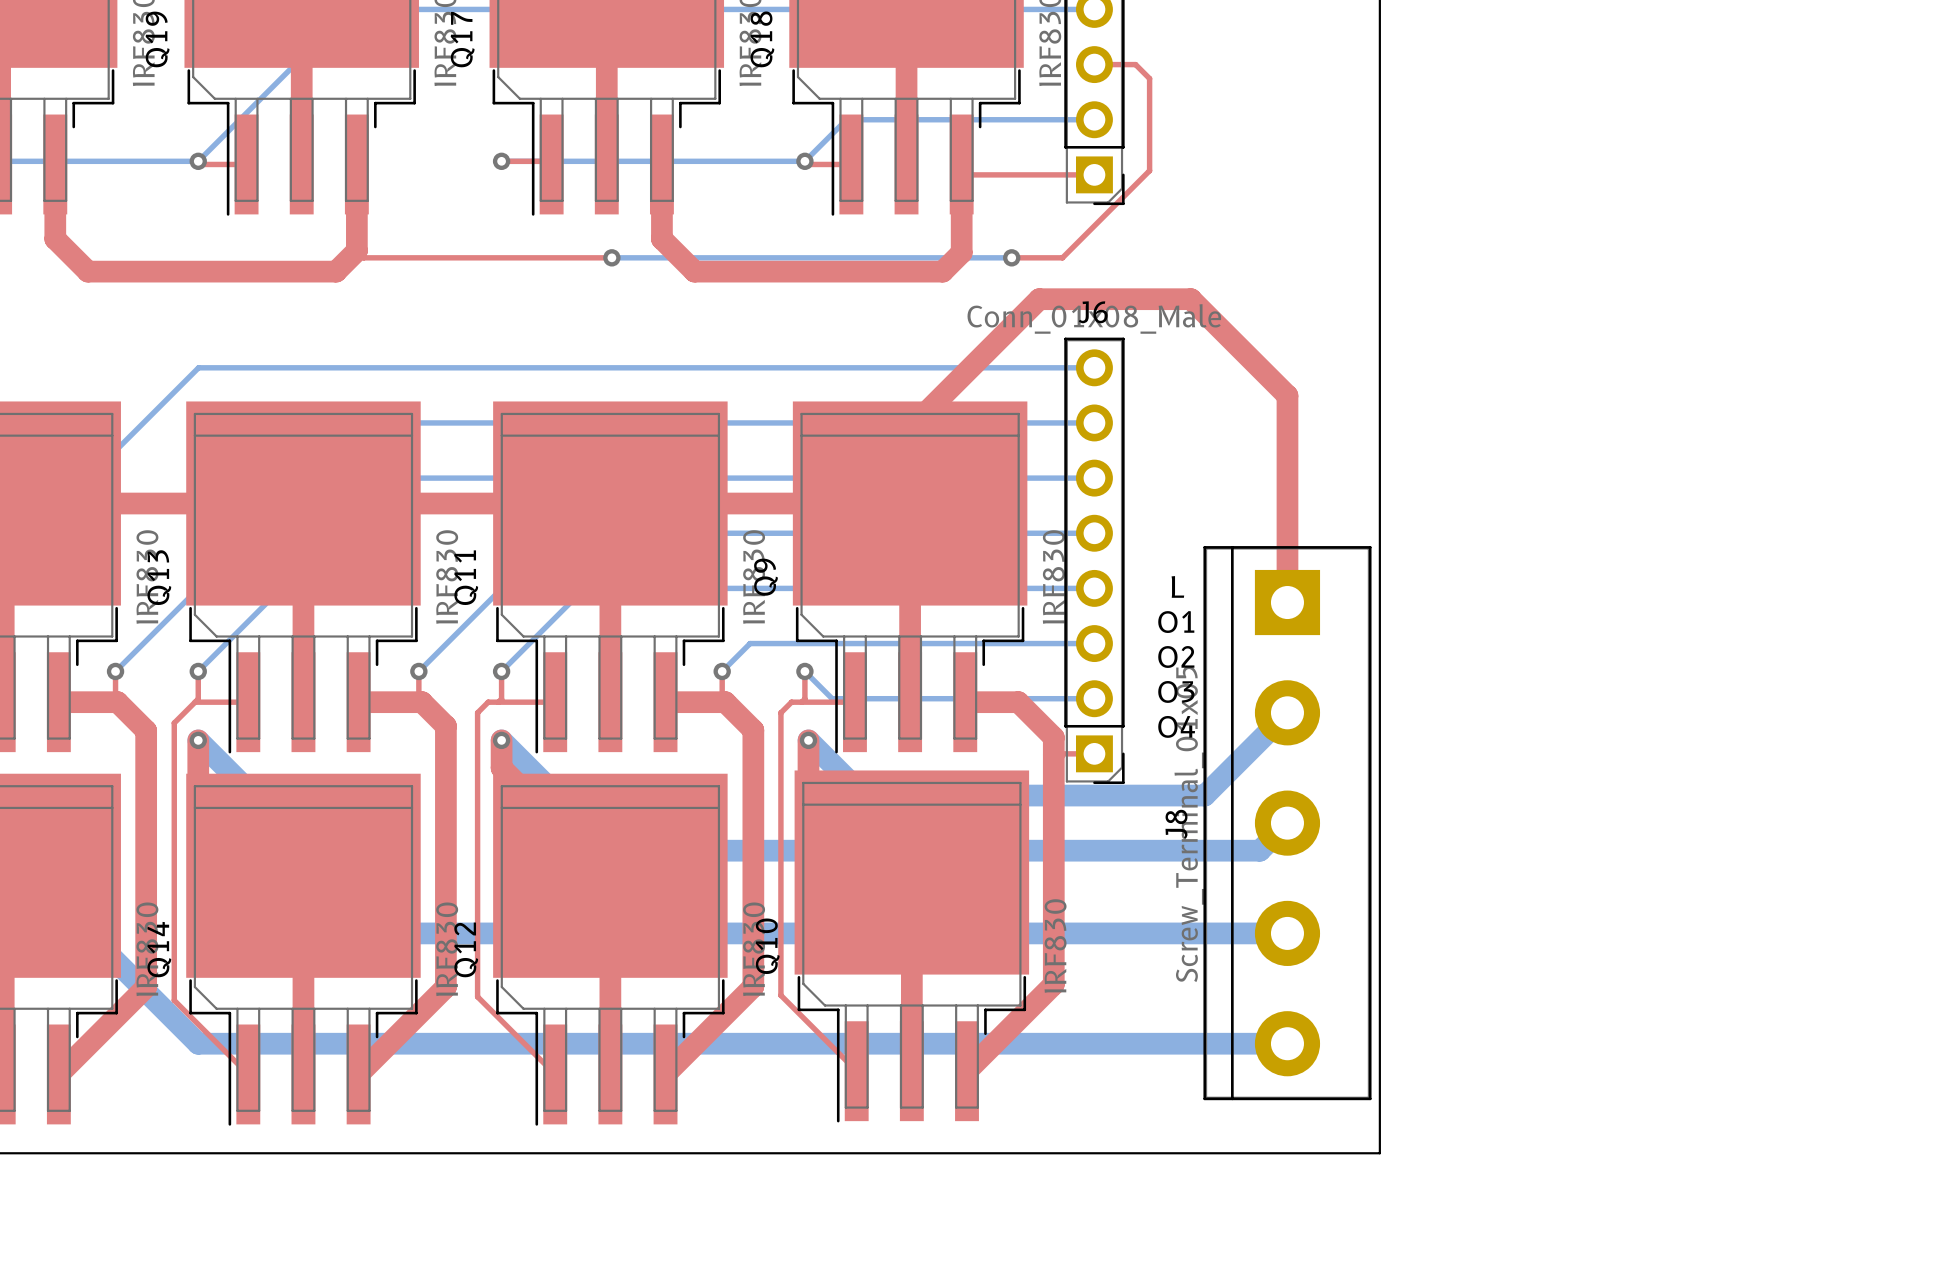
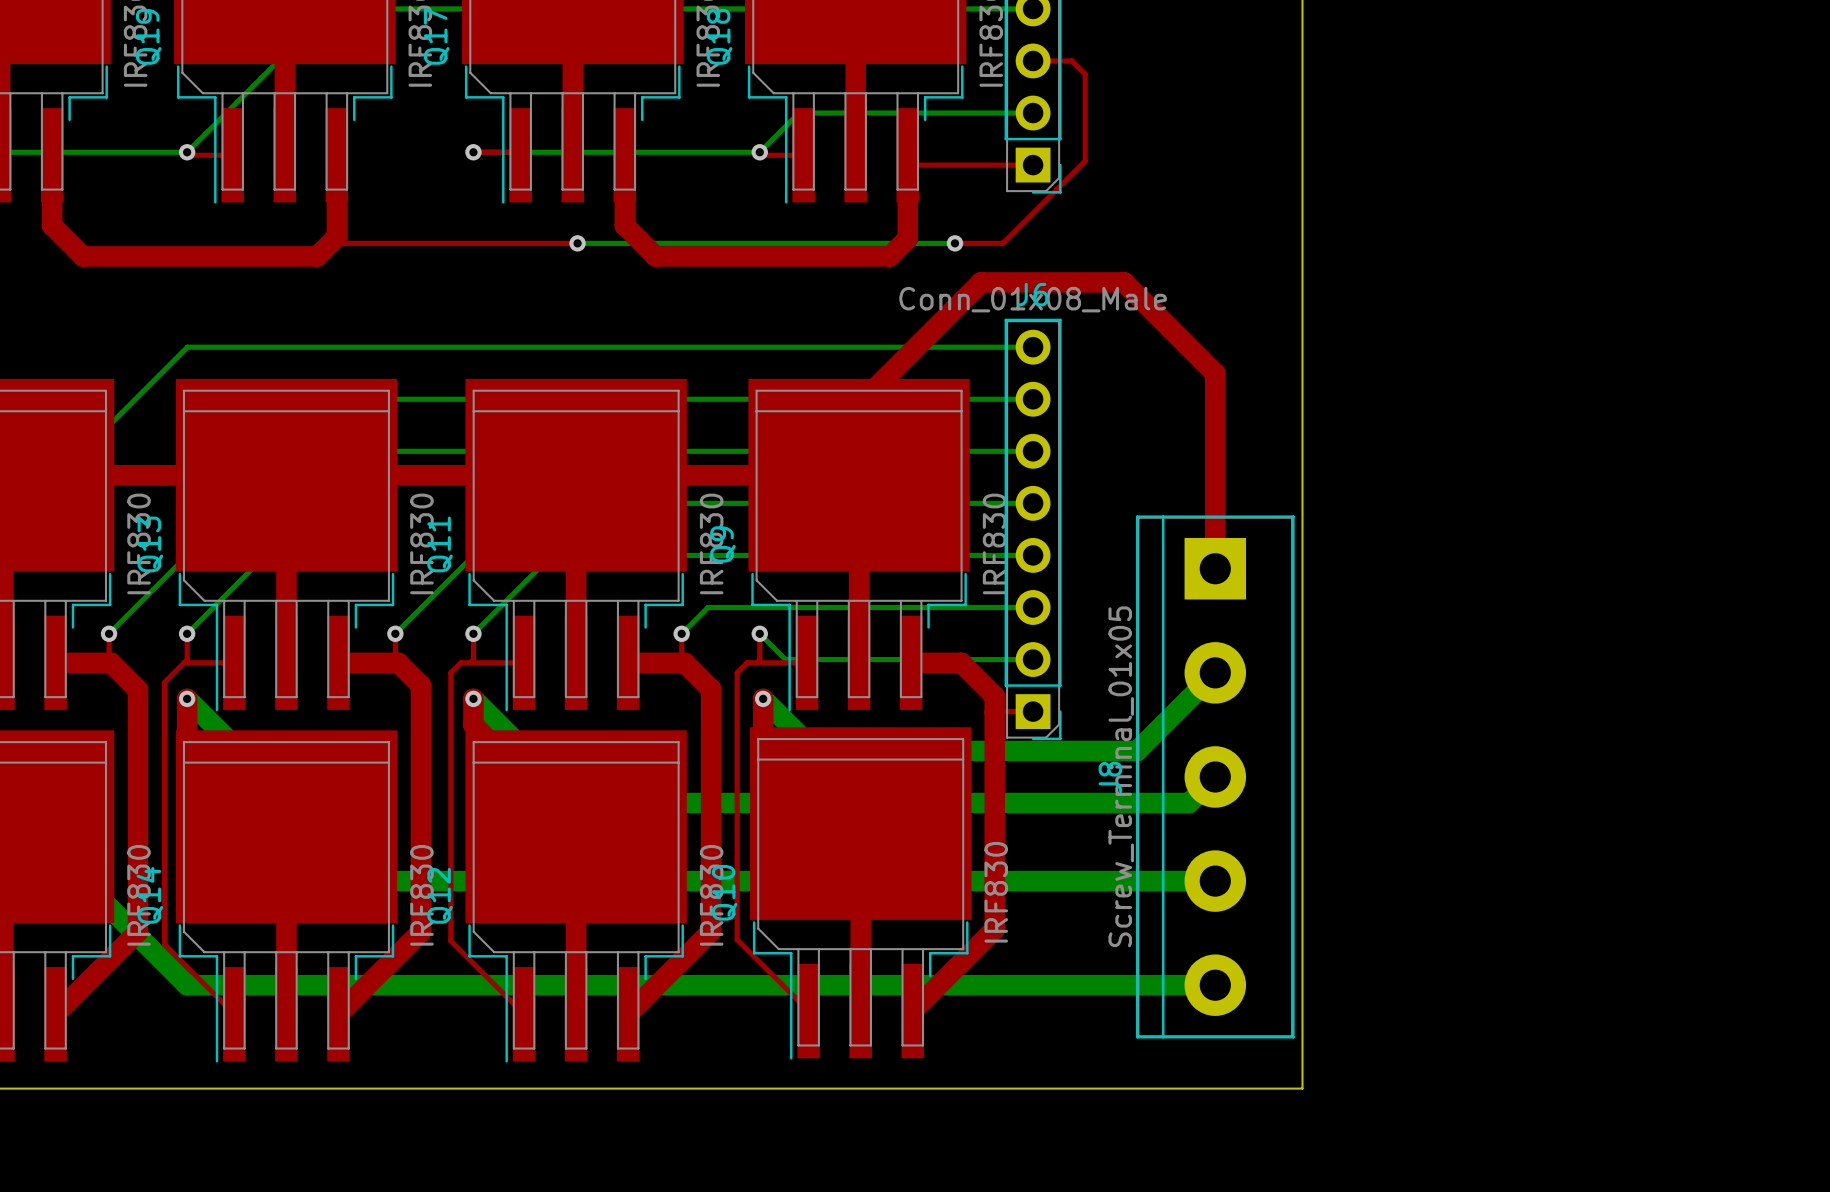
text: L (1177, 586) -> none
text: O1 (1176, 622) -> none
text: O2 (1176, 657) -> none
text: O3 (1176, 691) -> none
text: O4 (1176, 726) -> none

